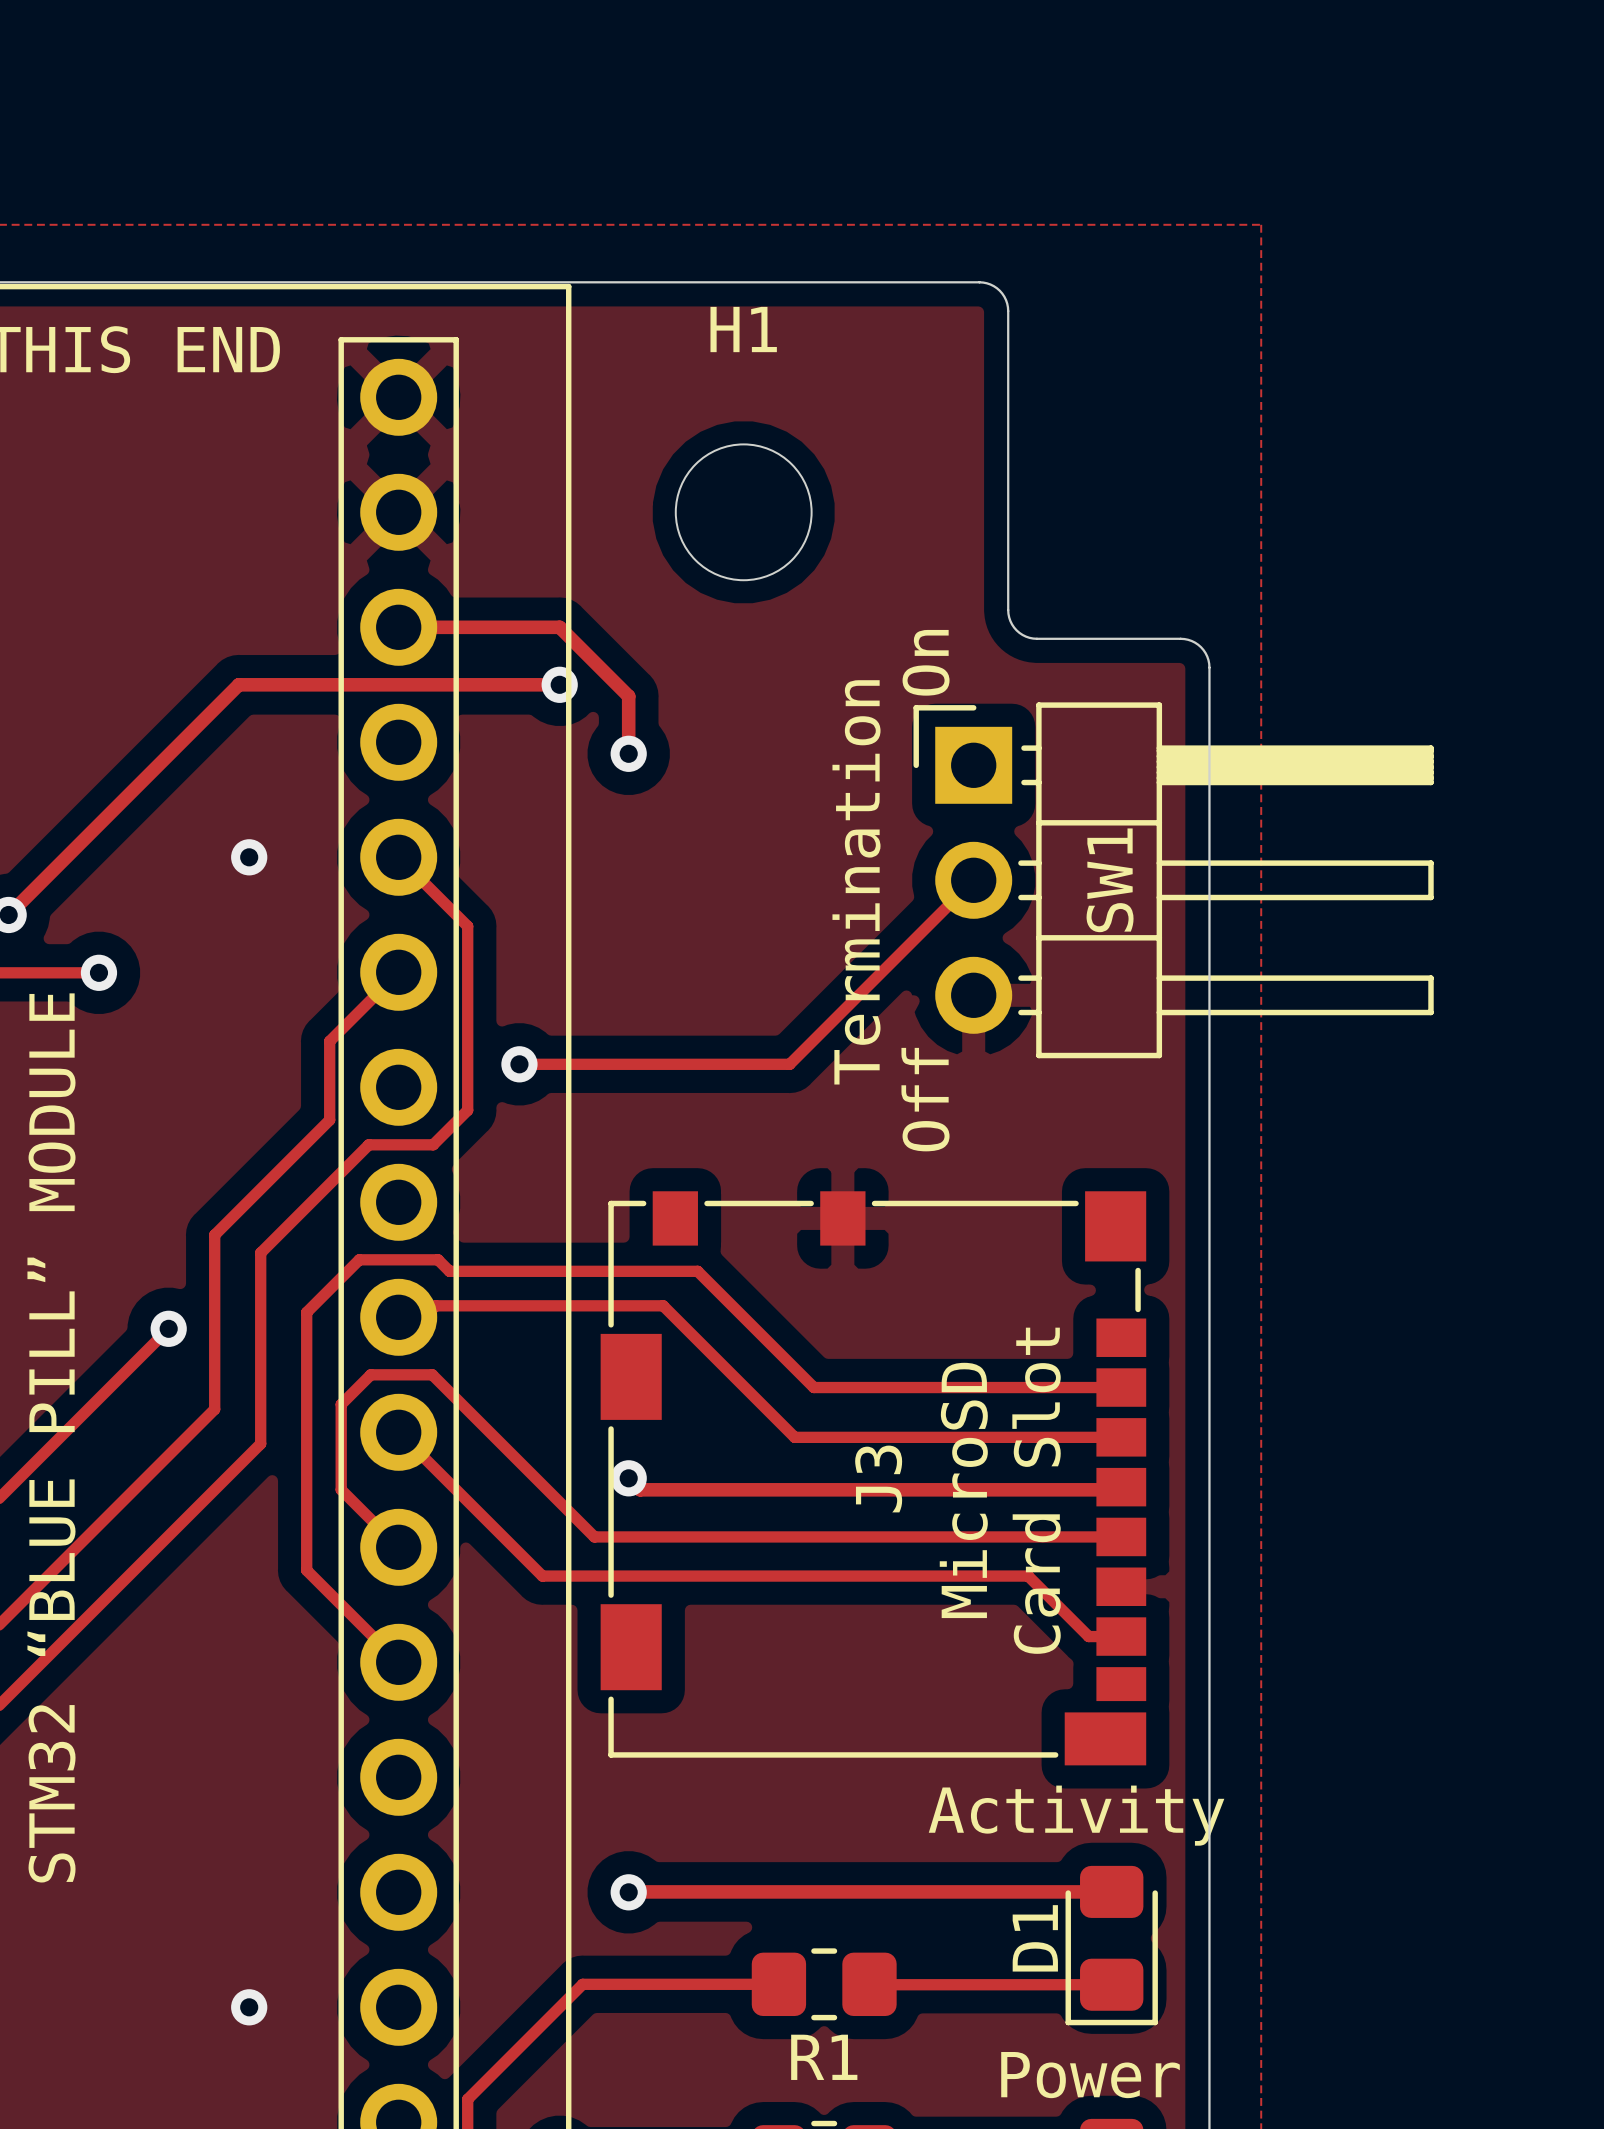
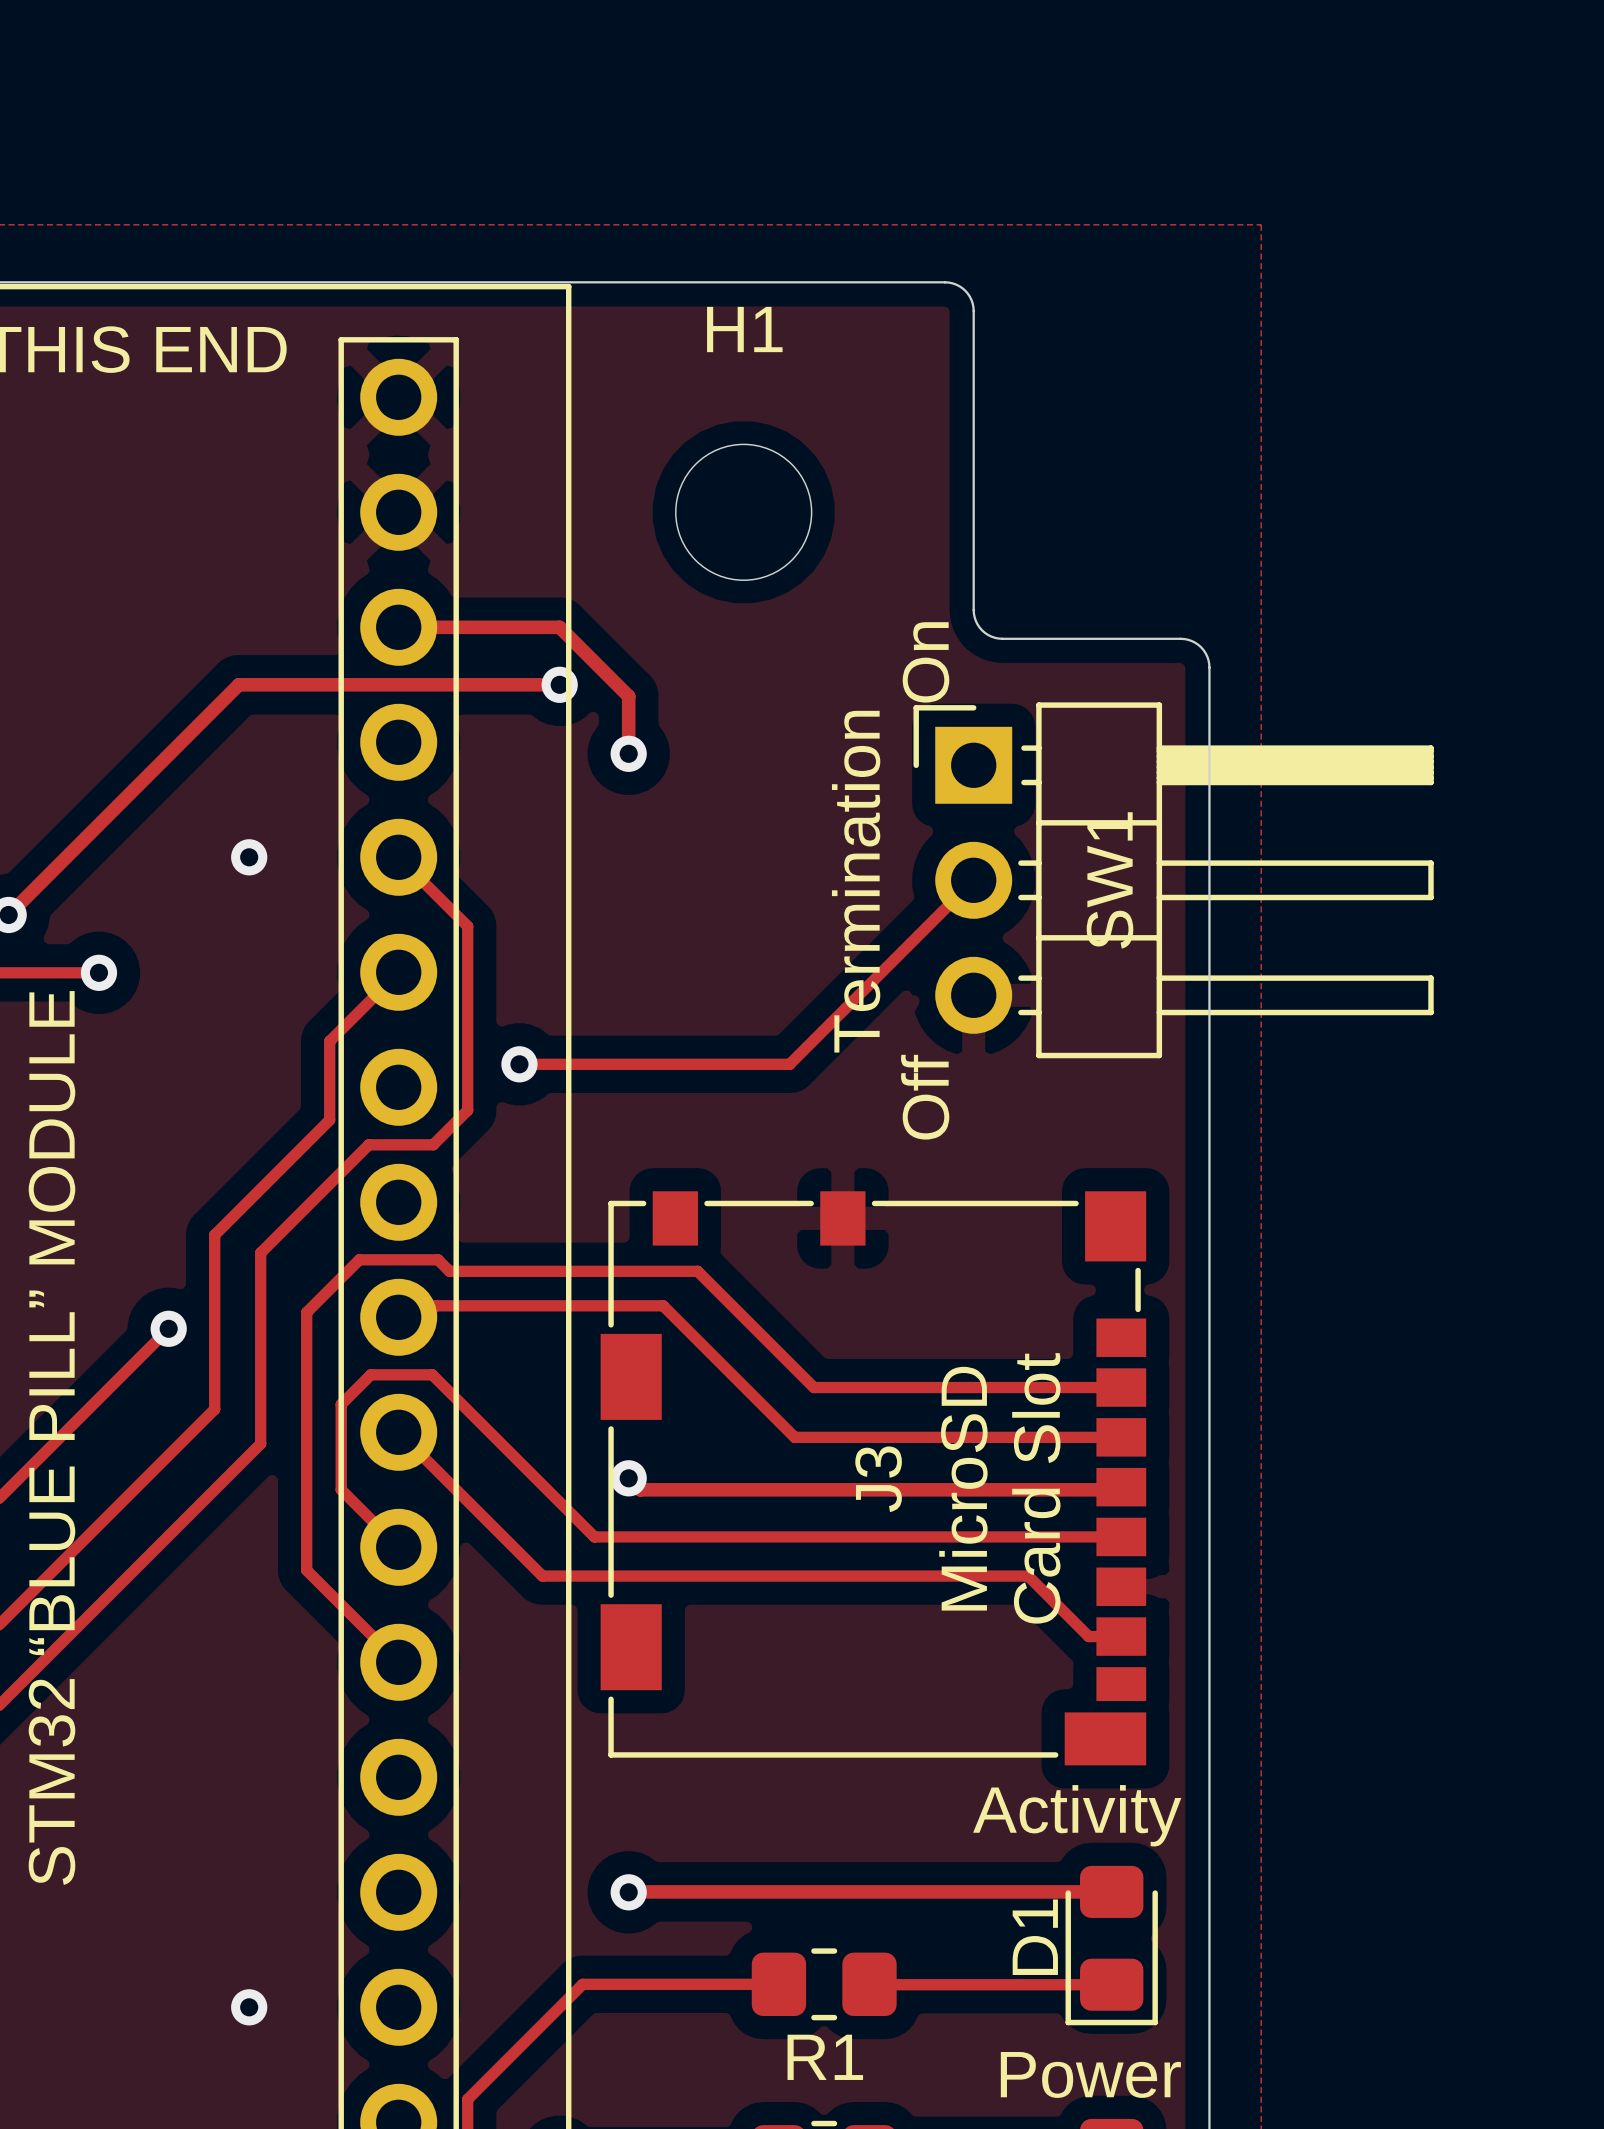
board edge: (944, 282) (979, 282) (990, 284) (1002, 293) (1007, 303) (1008, 613) (1016, 630) (1025, 636) (1036, 638) -> (944, 282) (955, 284) (965, 290) (973, 307) (974, 617) (979, 627) (991, 636) (1002, 638) (1036, 638)

